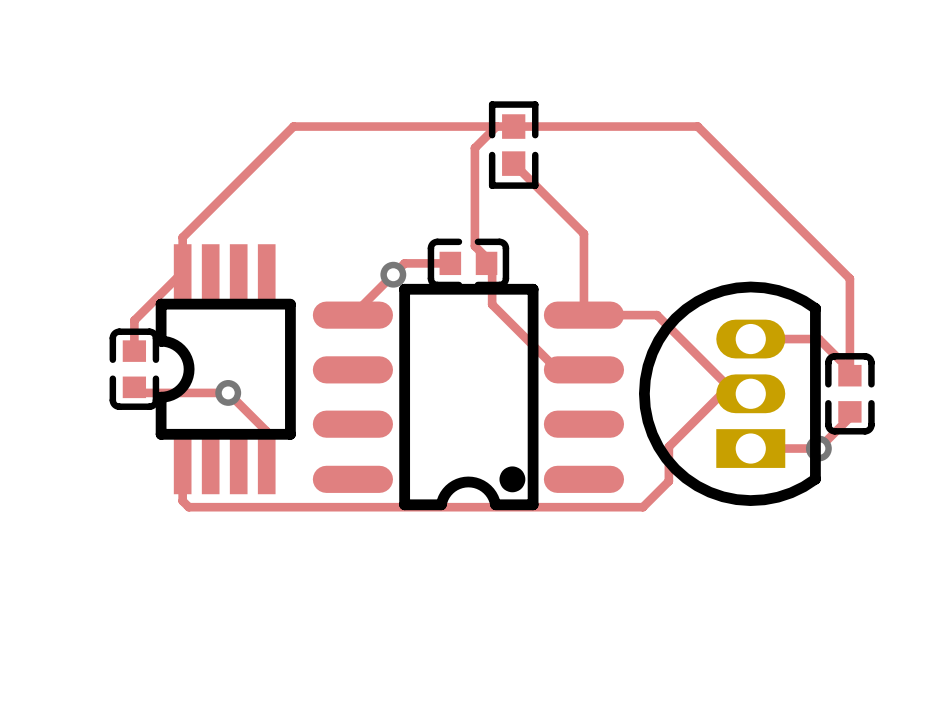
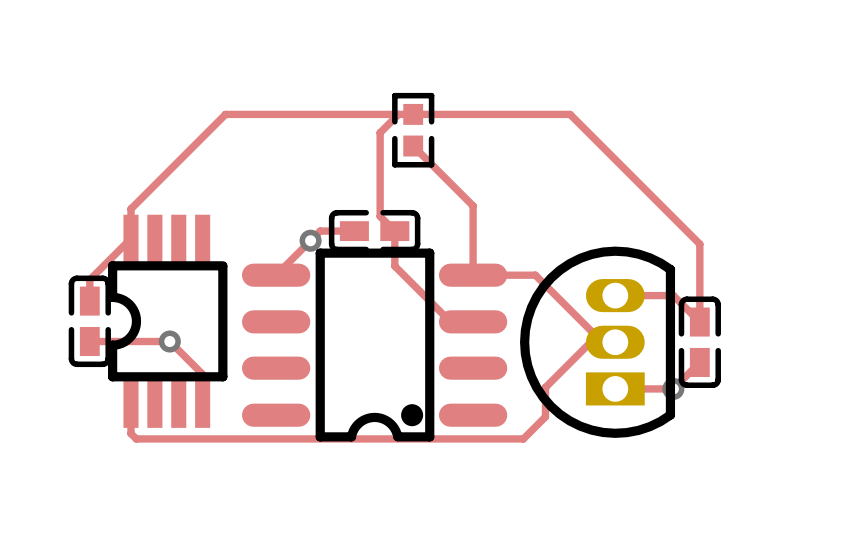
part footprint: [427, 238, 510, 289] -> [328, 209, 421, 253]
part footprint: [109, 328, 160, 410] -> [68, 275, 111, 368]
part footprint: [825, 353, 875, 435] -> [678, 296, 721, 389]

